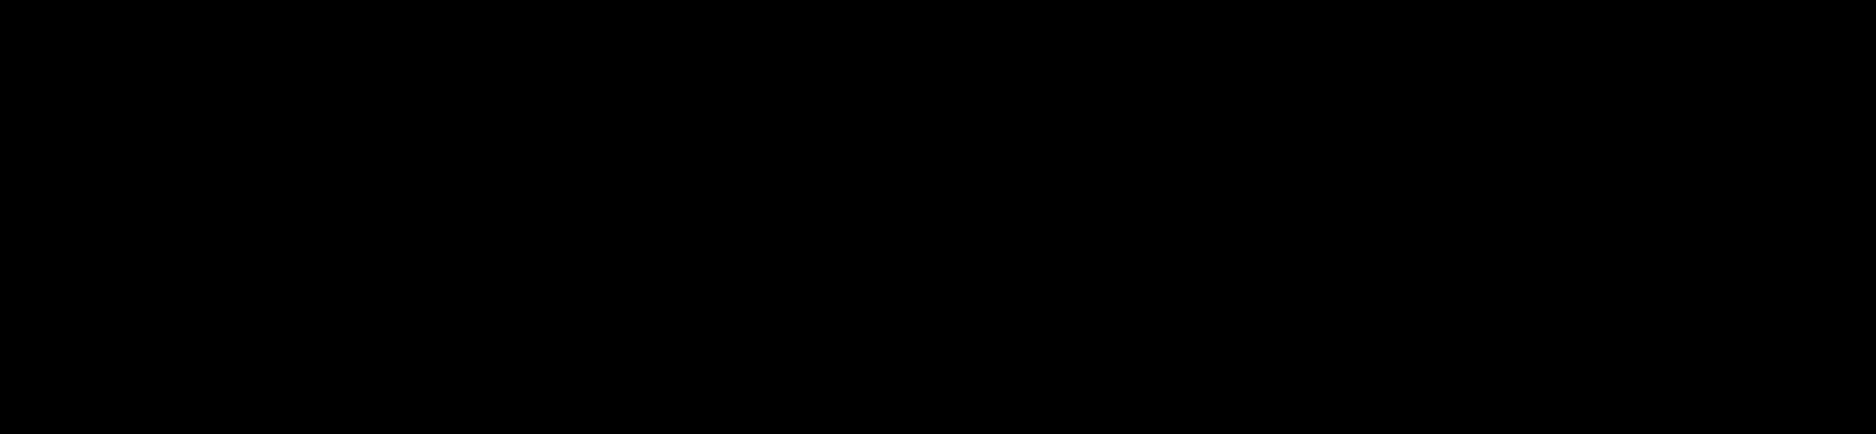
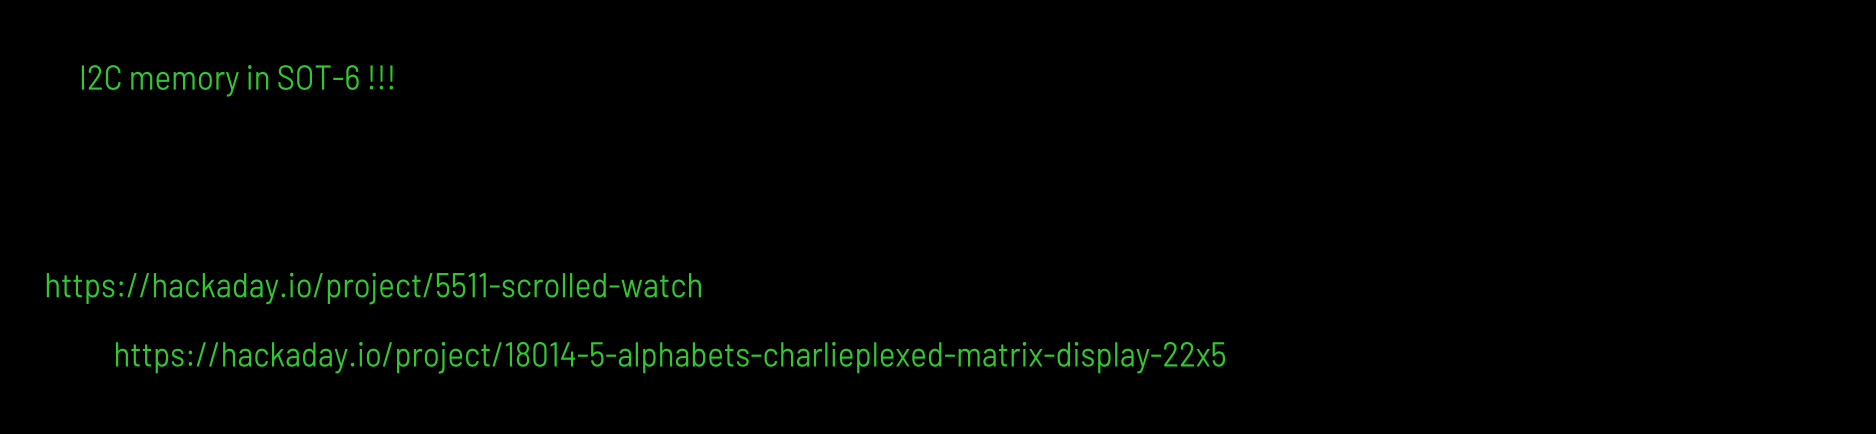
text: none -> I2C memory in SOT-6 !!! (237, 80)
text: none -> https://hackaday.io/project/5511-scrolled-watch (373, 288)
text: none -> https://hackaday.io/project/18014-5-alphabets-charlieplexed-matrix-display-22x5 (670, 357)

